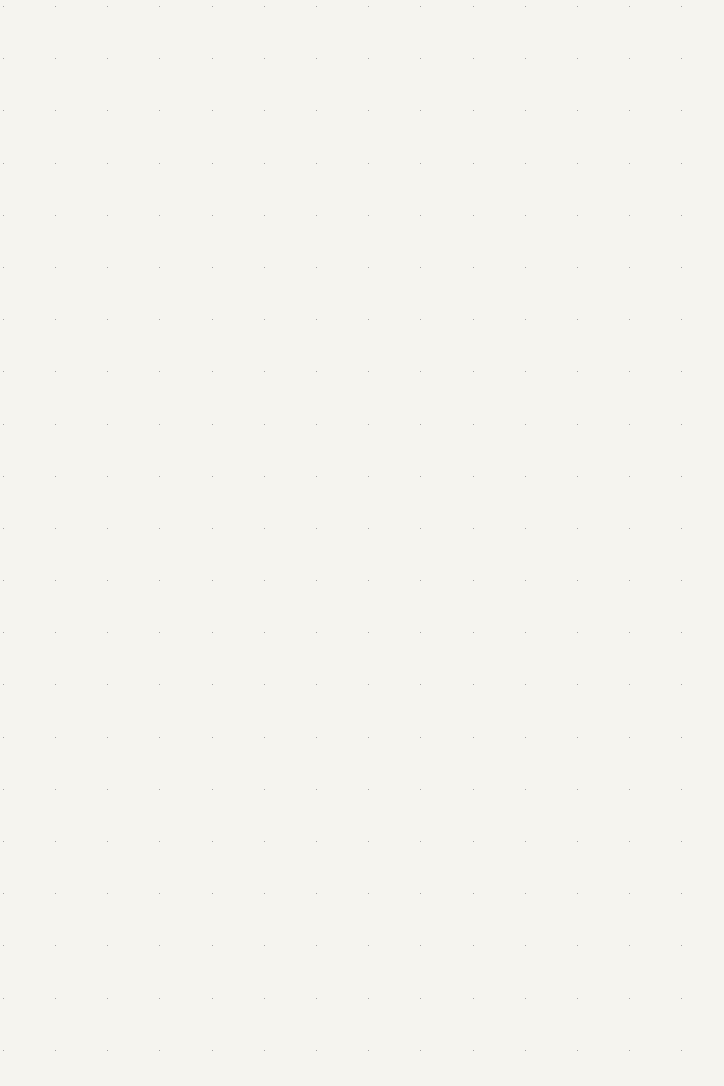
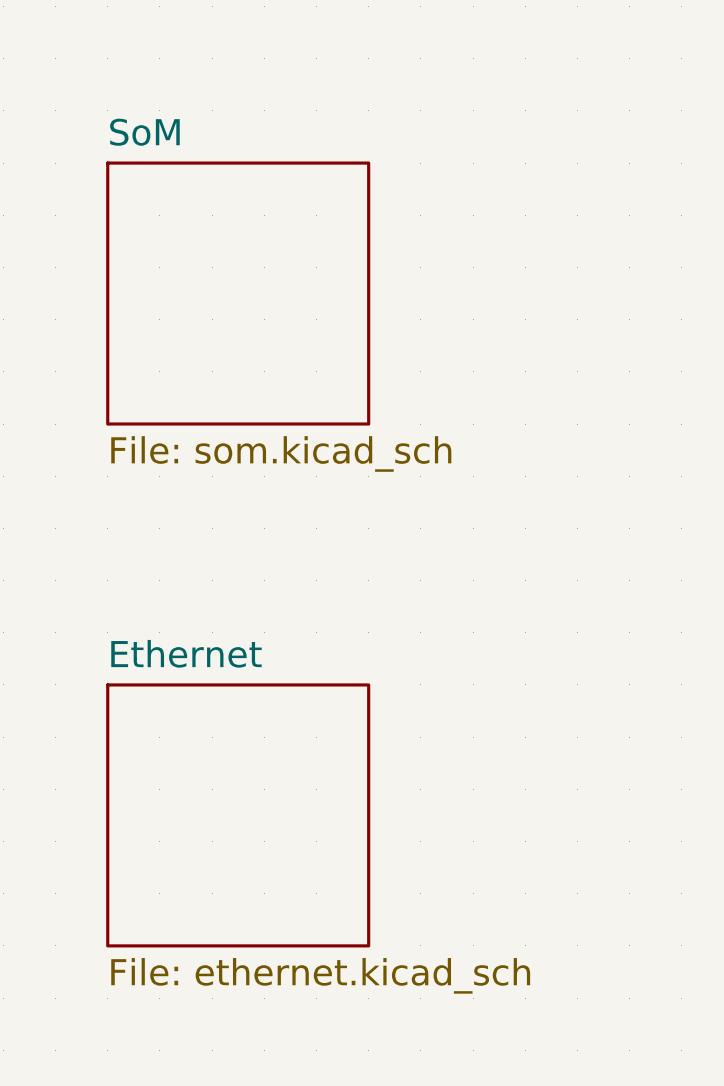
sheet SoM: none -> File: som.kicad_sch (238, 293)
sheet Ethernet: none -> File: ethernet.kicad_sch (238, 815)

